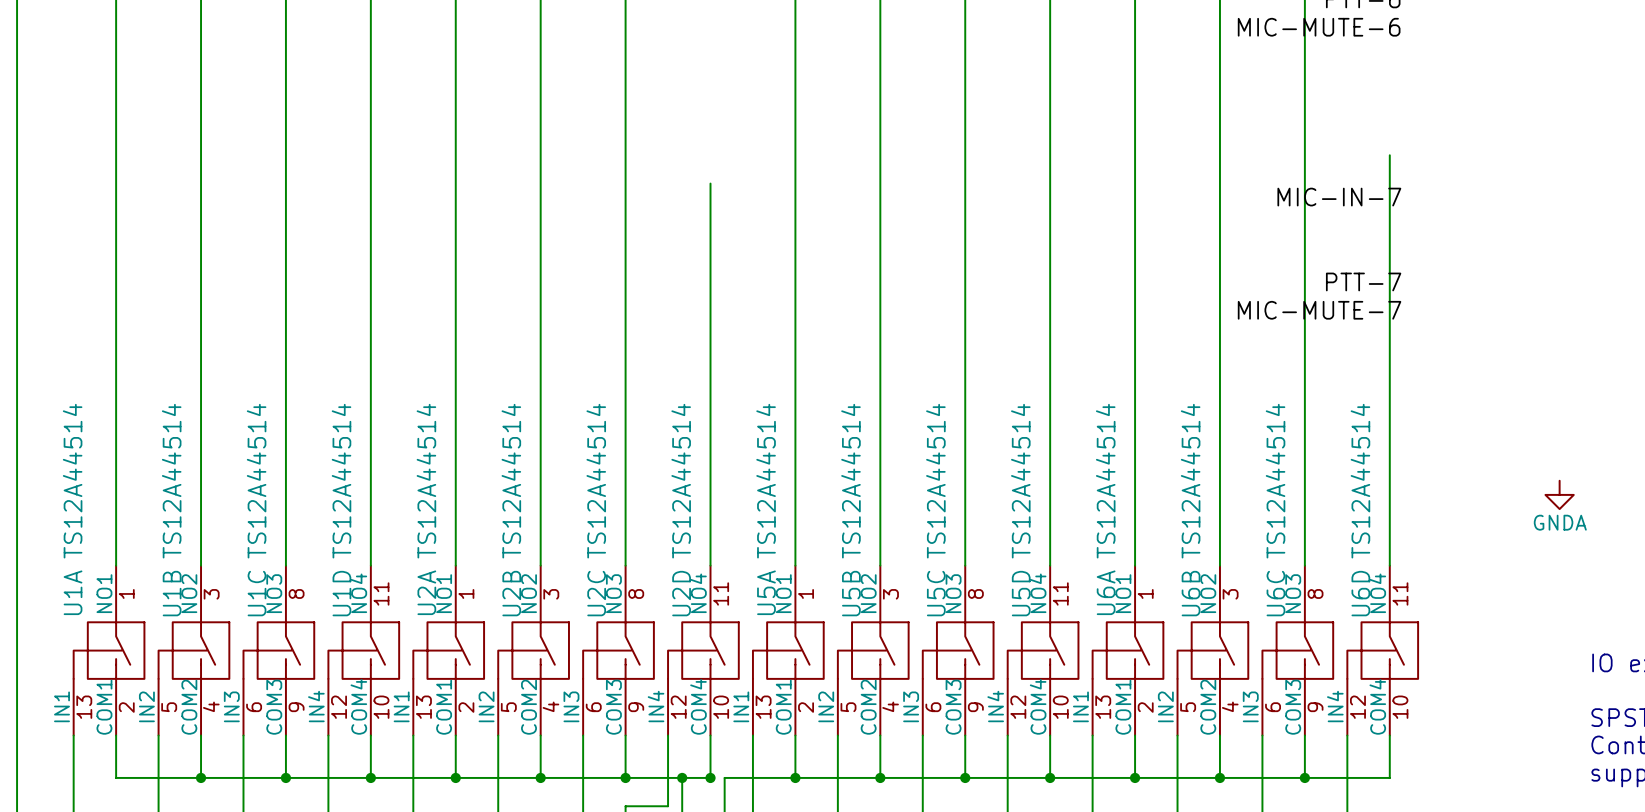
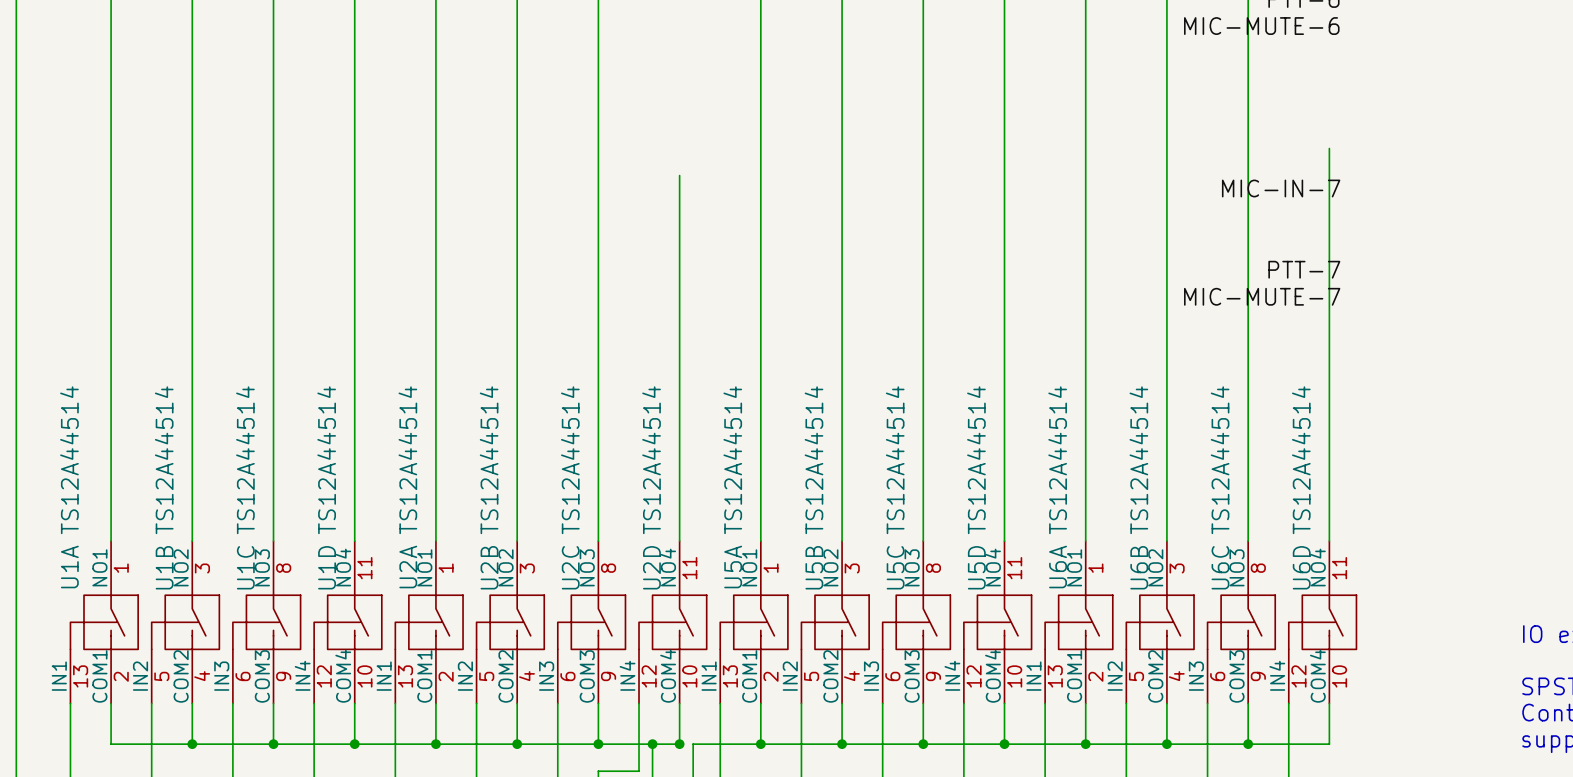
power symbol: GNDA (1559, 494) -> none

